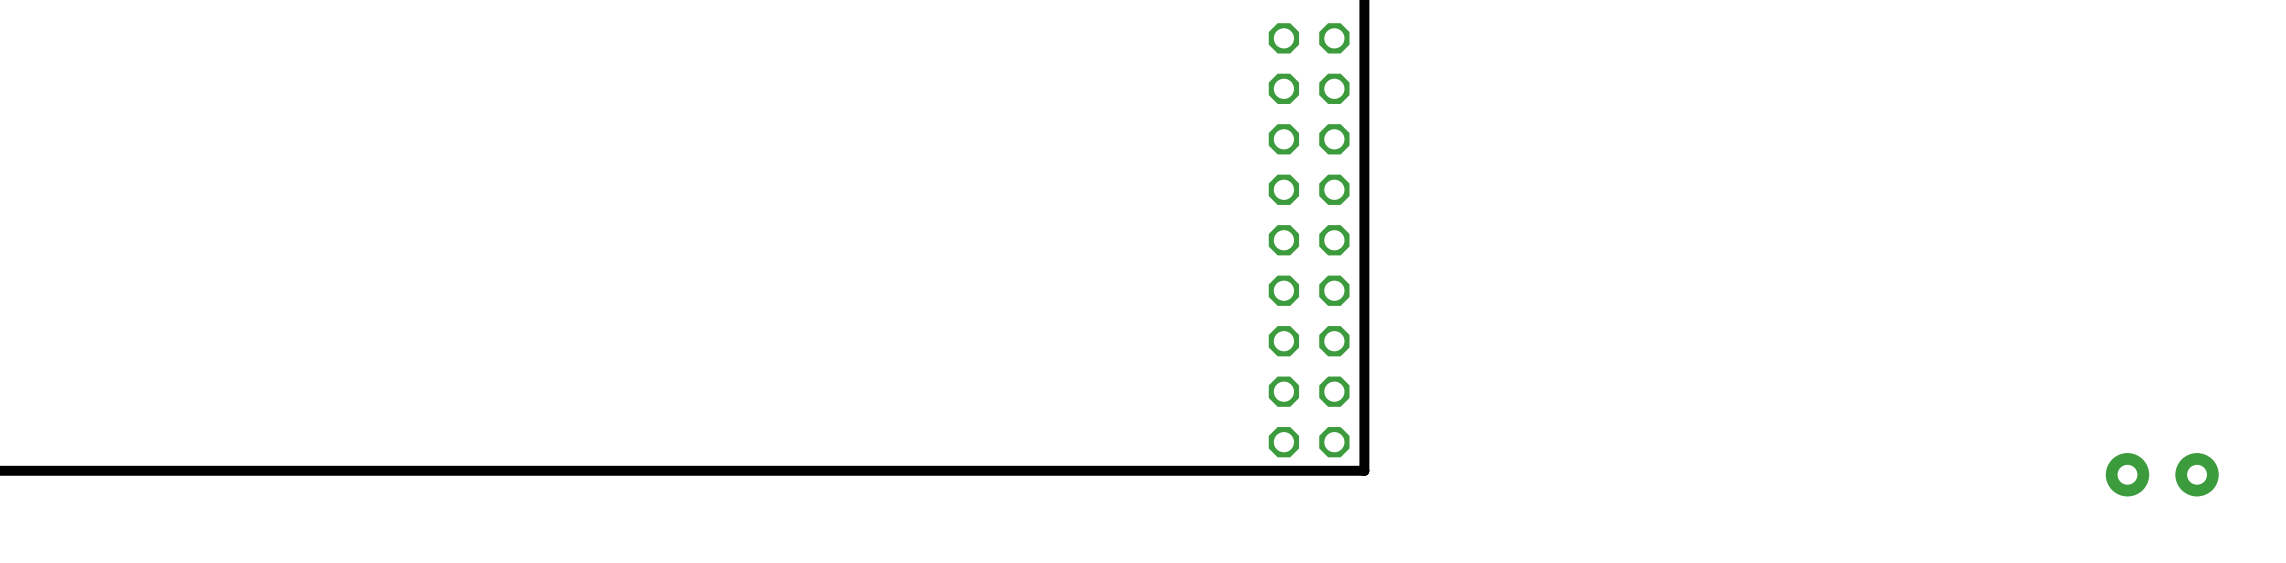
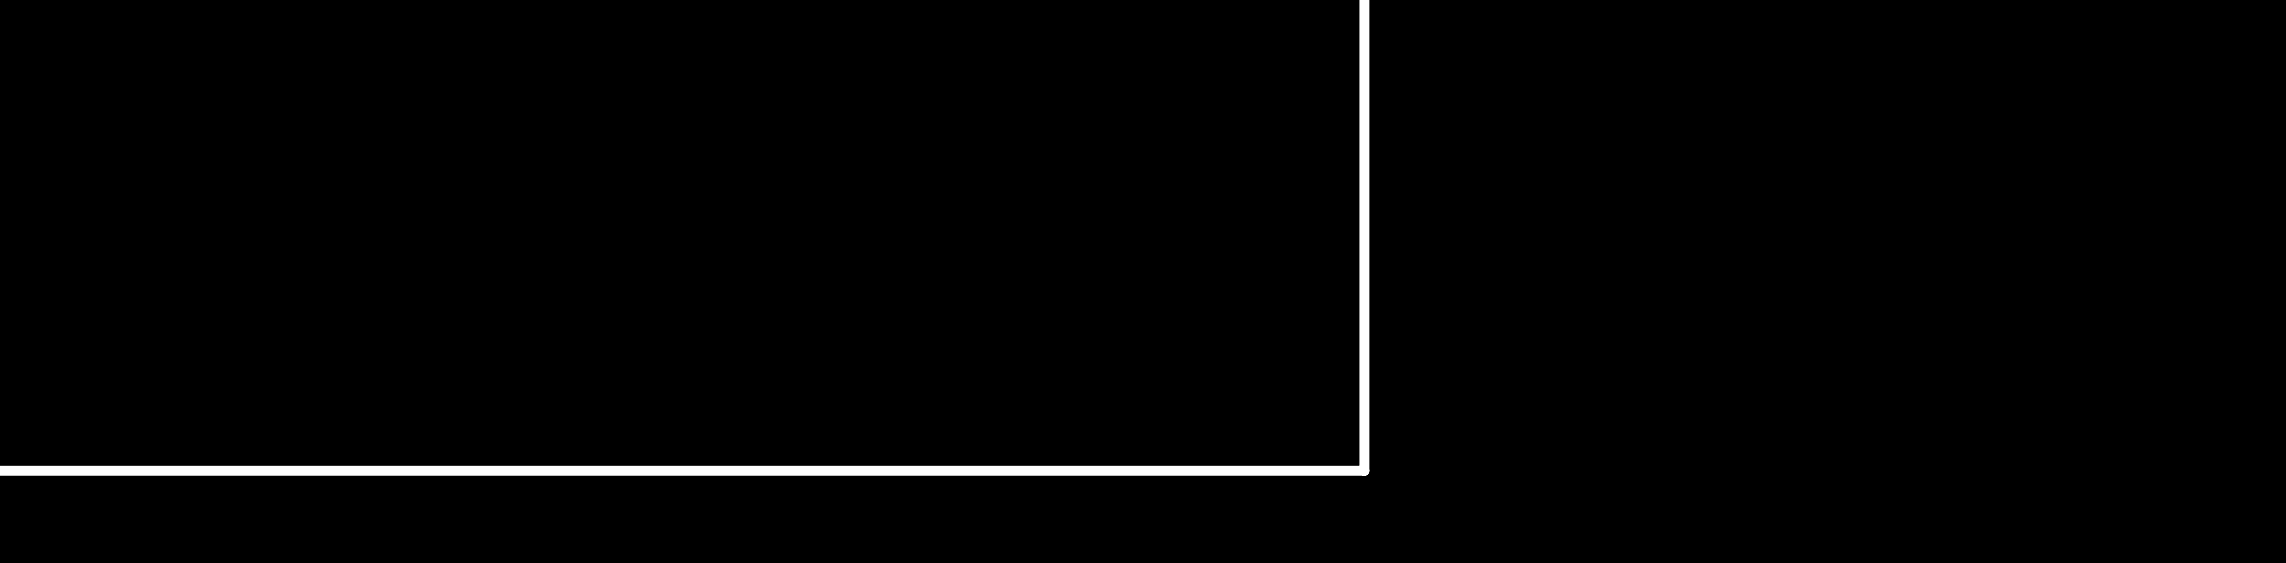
part: (1309, 240) -> none
part: (2162, 474) -> none

